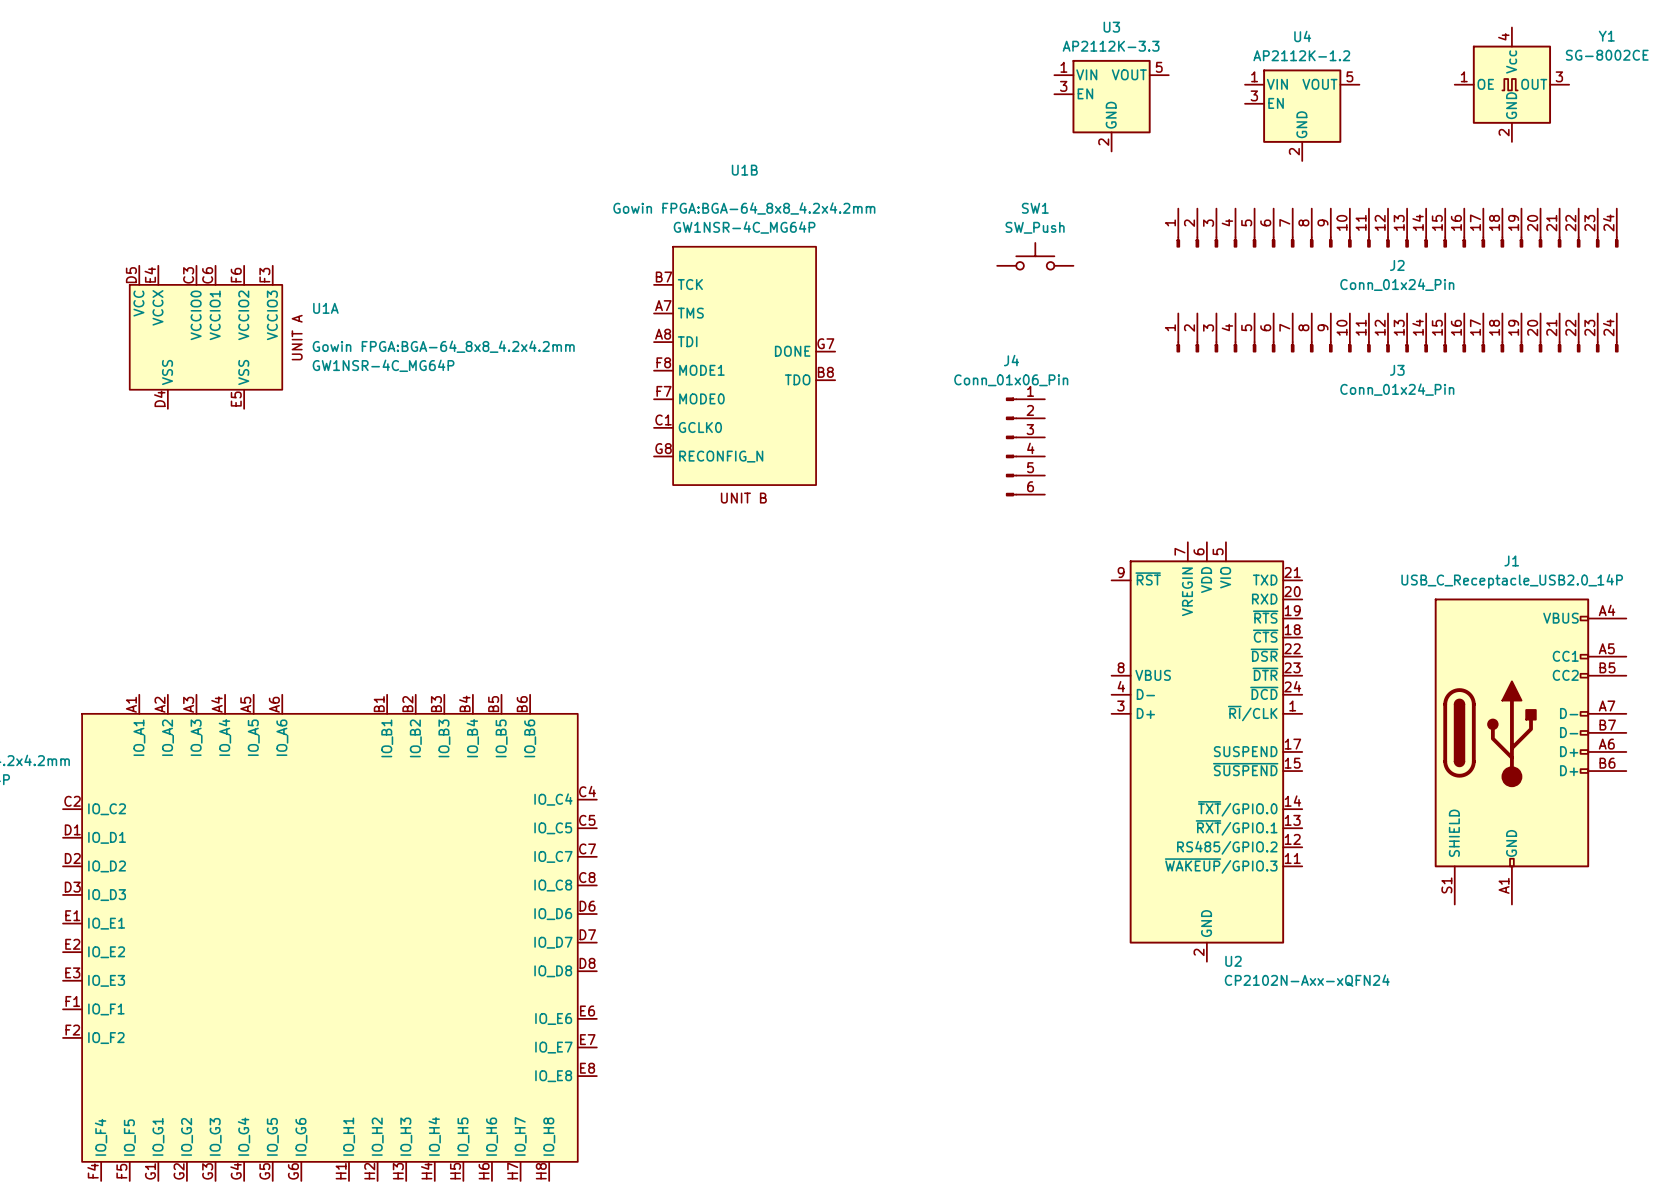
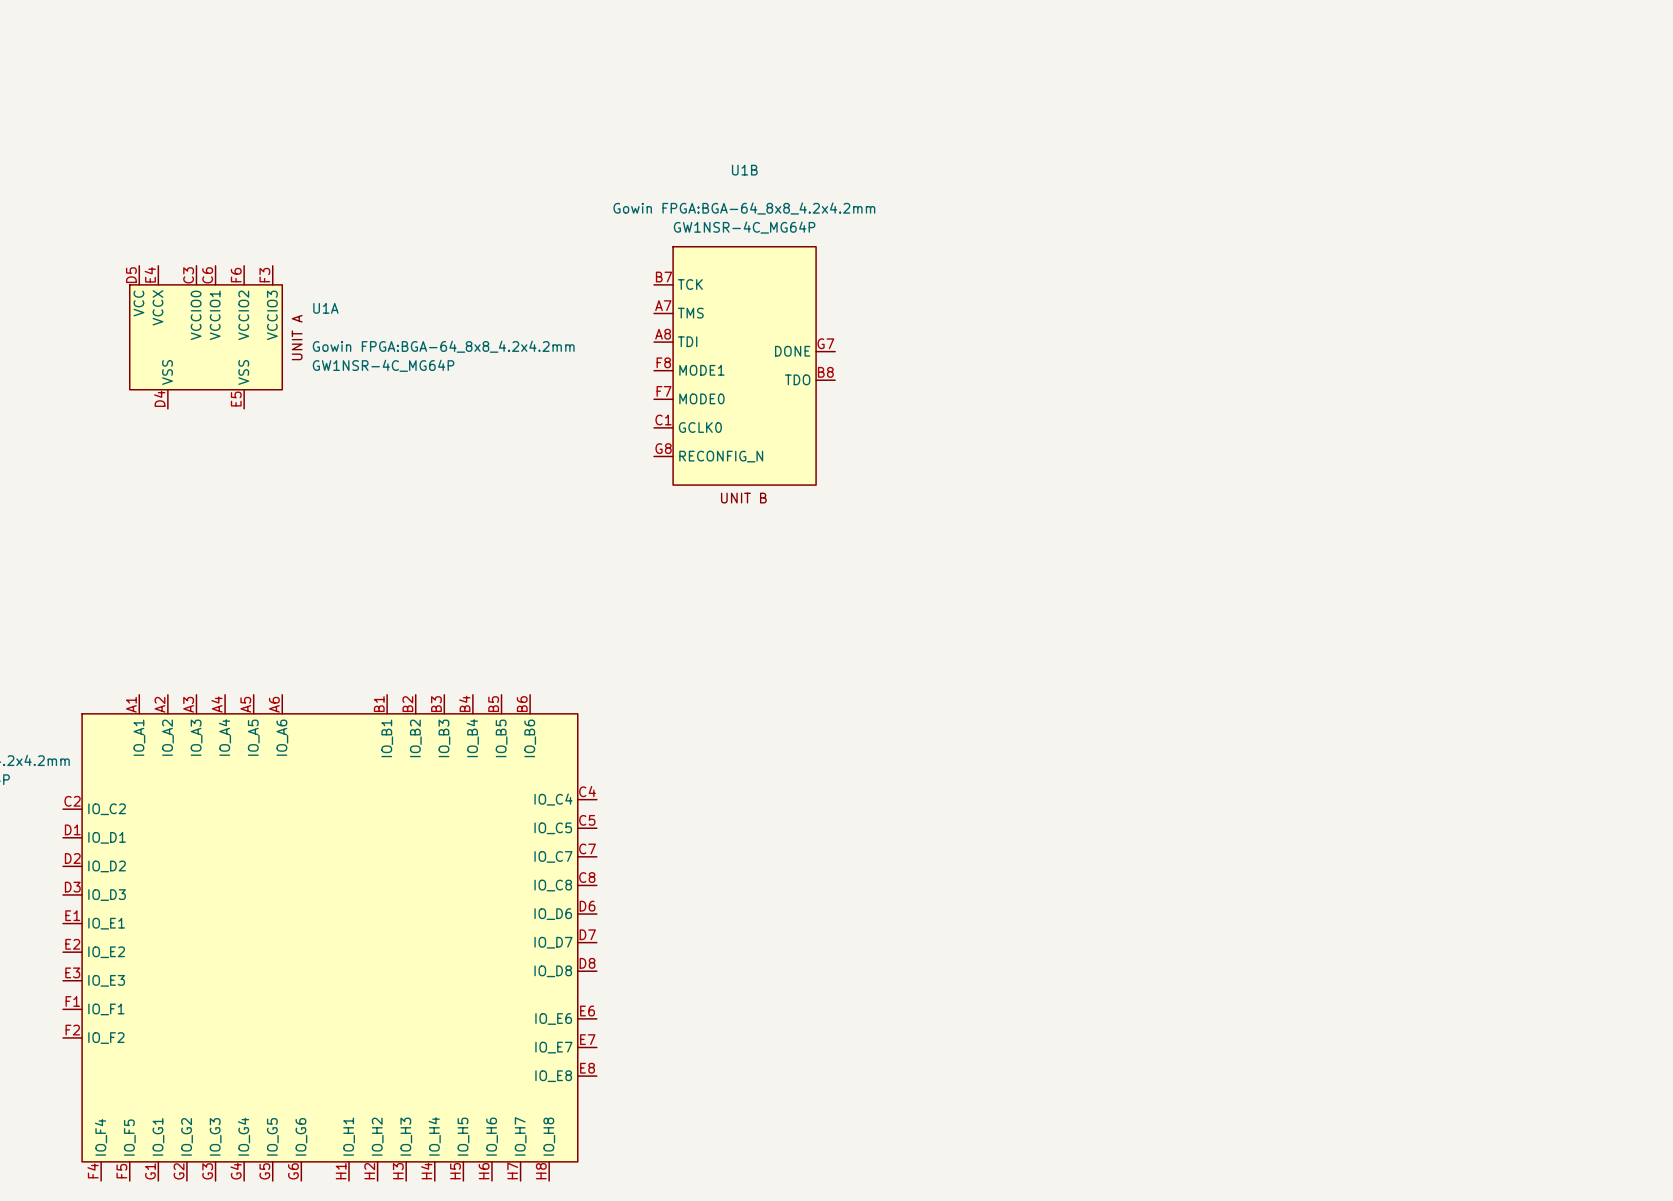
Y1: SG-8002CE (1511, 84) -> none
U3: AP2112K-3.3 (1111, 105) -> none
U4: AP2112K-1.2 (1302, 115) -> none
J2: Conn_01x24_Pin (1397, 227) -> none
SW1: SW_Push (1035, 256) -> none
J3: Conn_01x24_Pin (1397, 332) -> none
J4: Conn_01x06_Pin (1025, 446) -> none
U2: CP2102N-Axx-xQFN24 (1206, 751) -> none
J1: USB_C_Receptacle_USB2.0_14P (1530, 751) -> none

